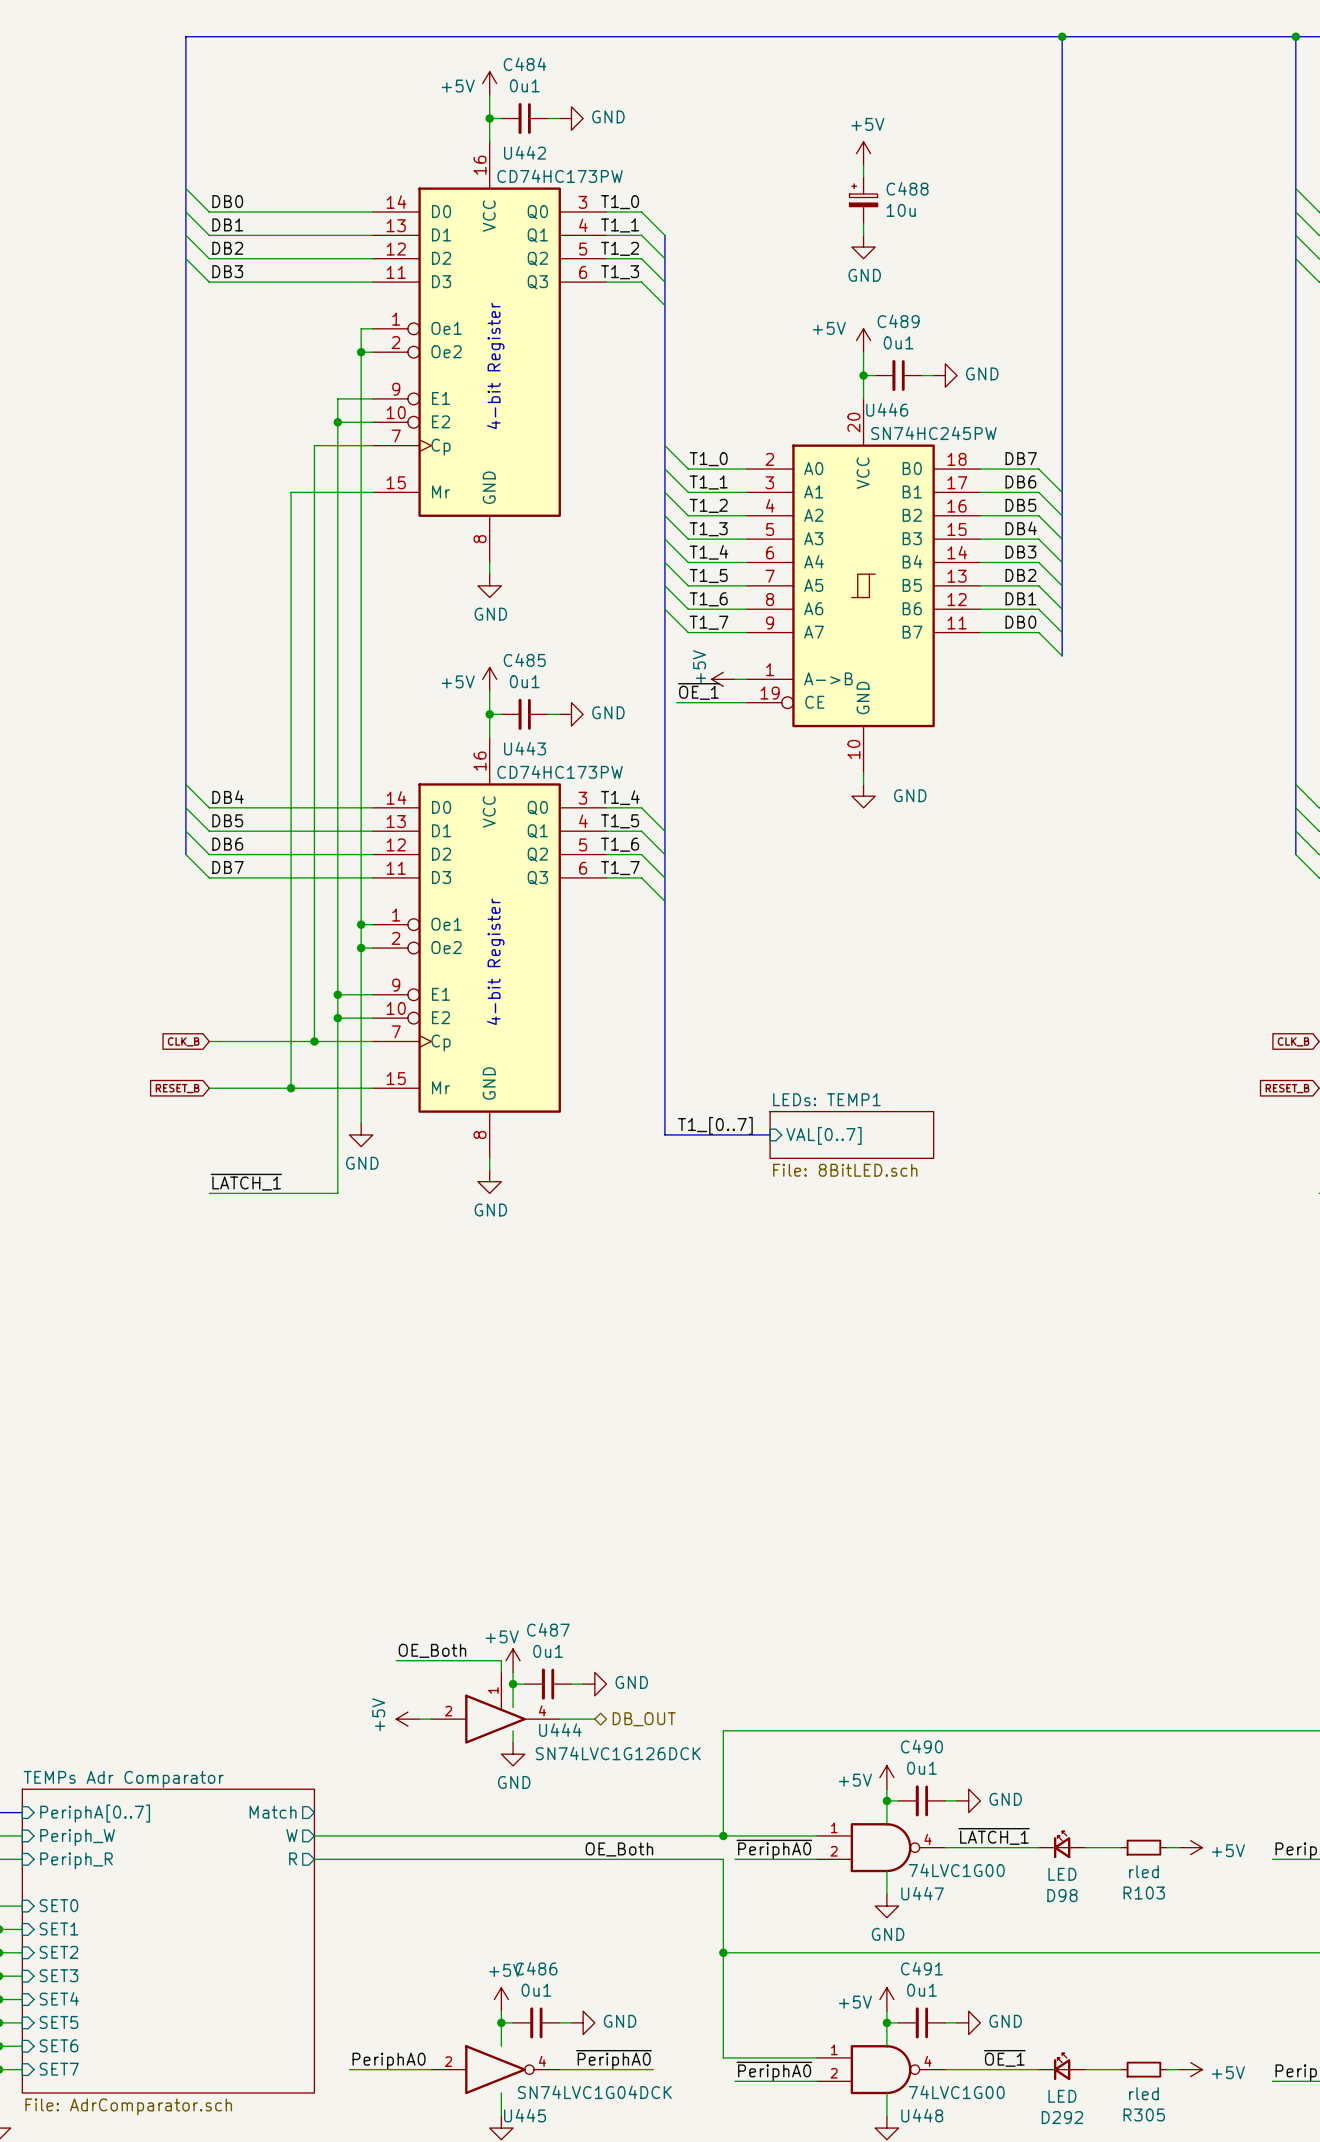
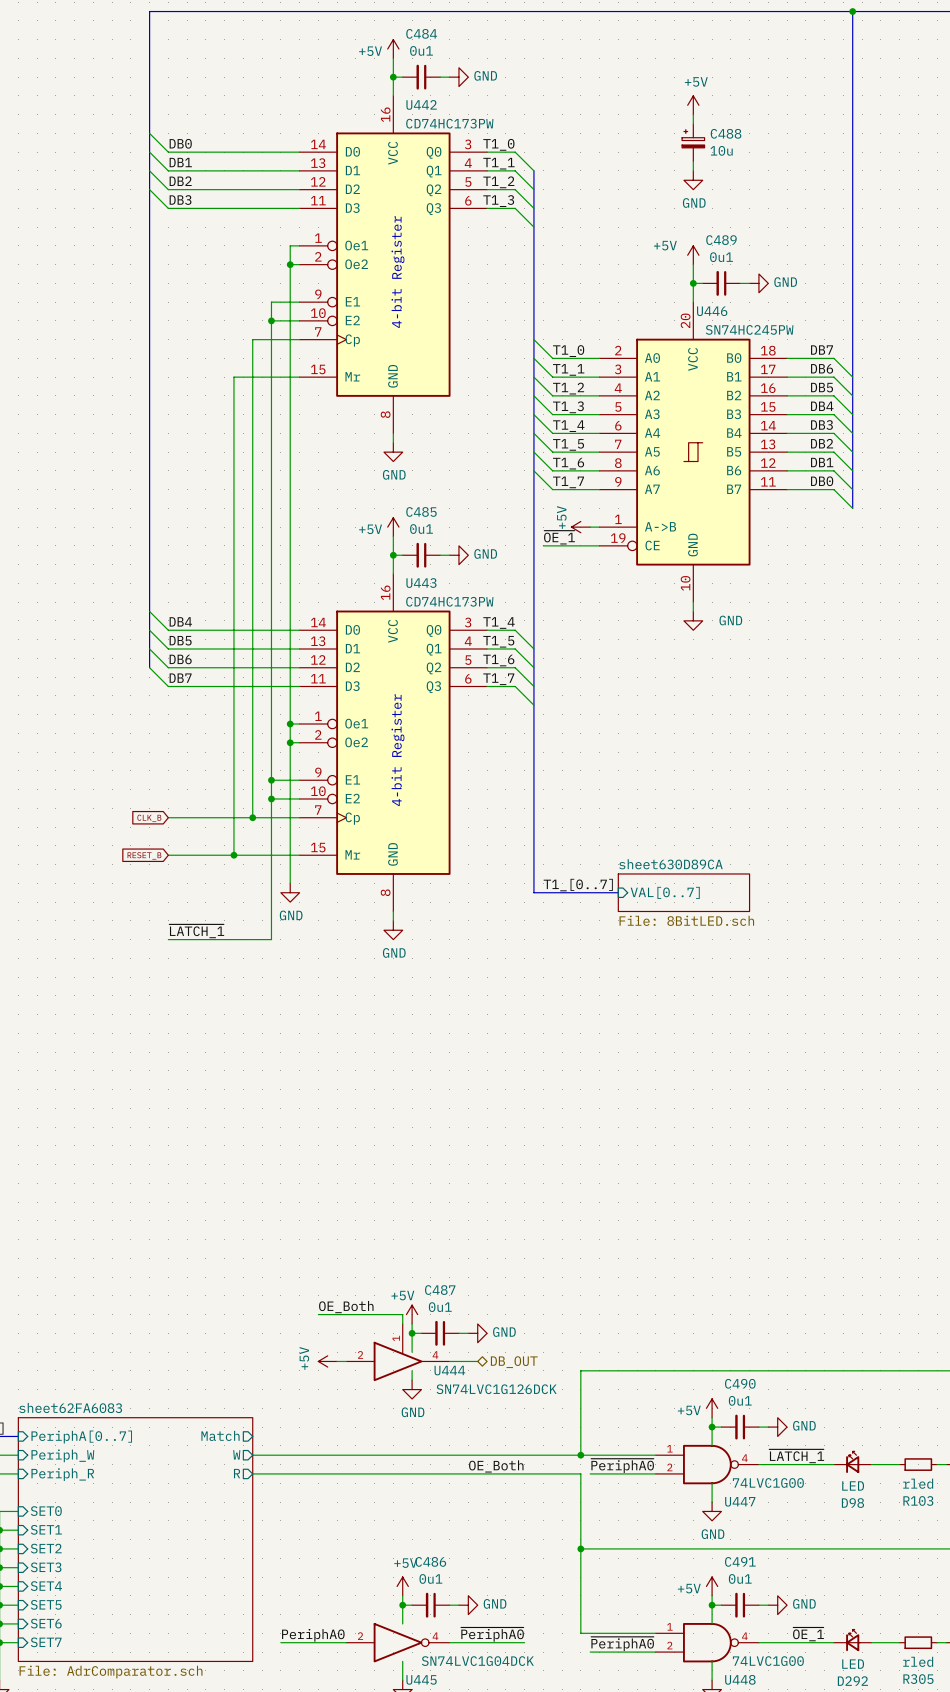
sheet sheet630D89CA name: LEDs: TEMP1 (826, 1099) -> sheet630D89CA (670, 864)
sheet TEMPs Adr Comparator name: TEMPs Adr Comparator (123, 1779) -> sheet62FA6083 (70, 1407)

